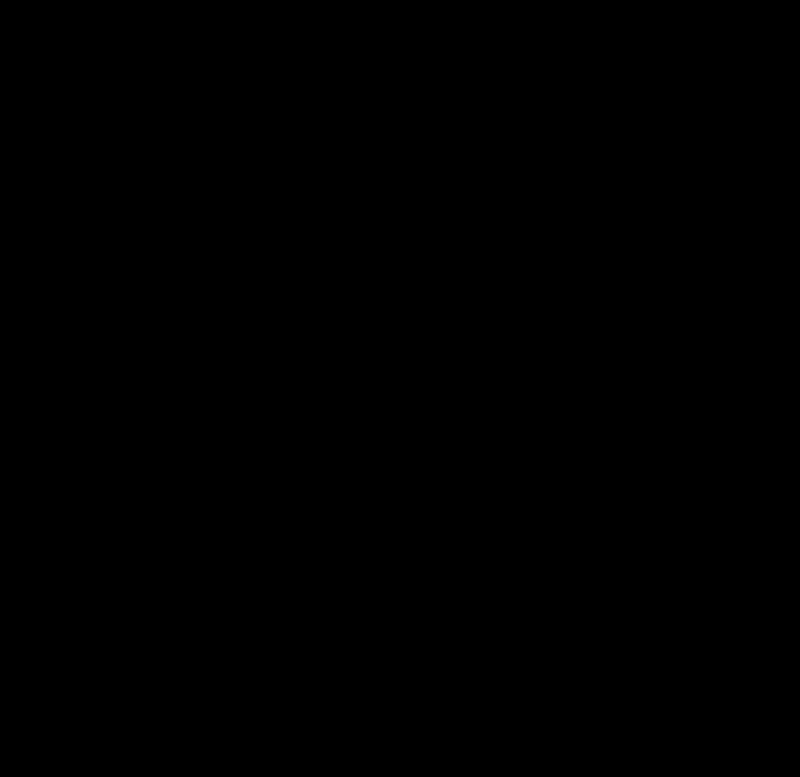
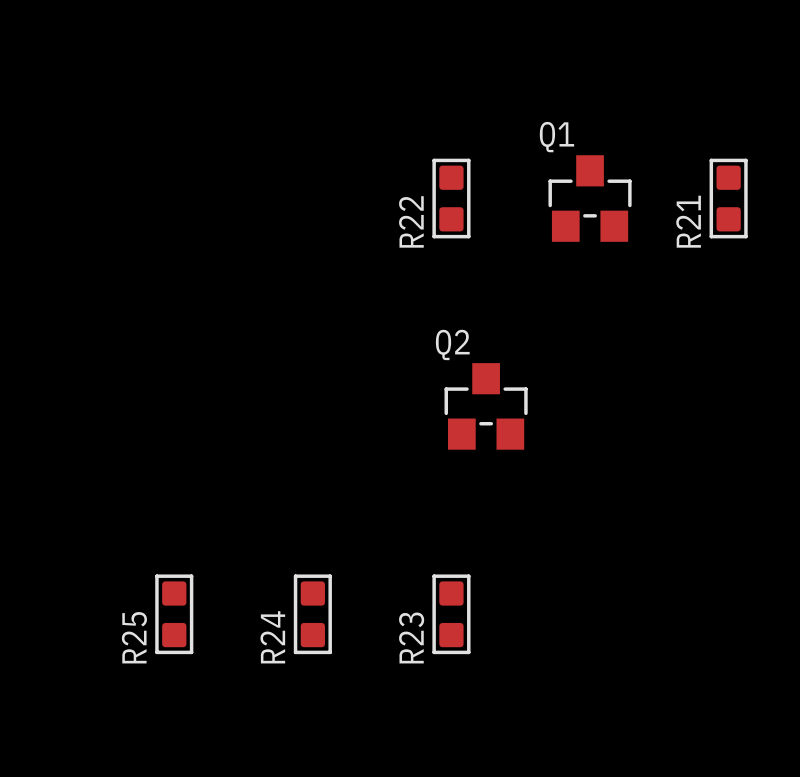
R22: none -> (451, 198)
Q1: none -> (590, 198)
R21: none -> (728, 198)
Q2: none -> (486, 406)
R25: none -> (174, 614)
R24: none -> (312, 614)
R23: none -> (451, 614)

